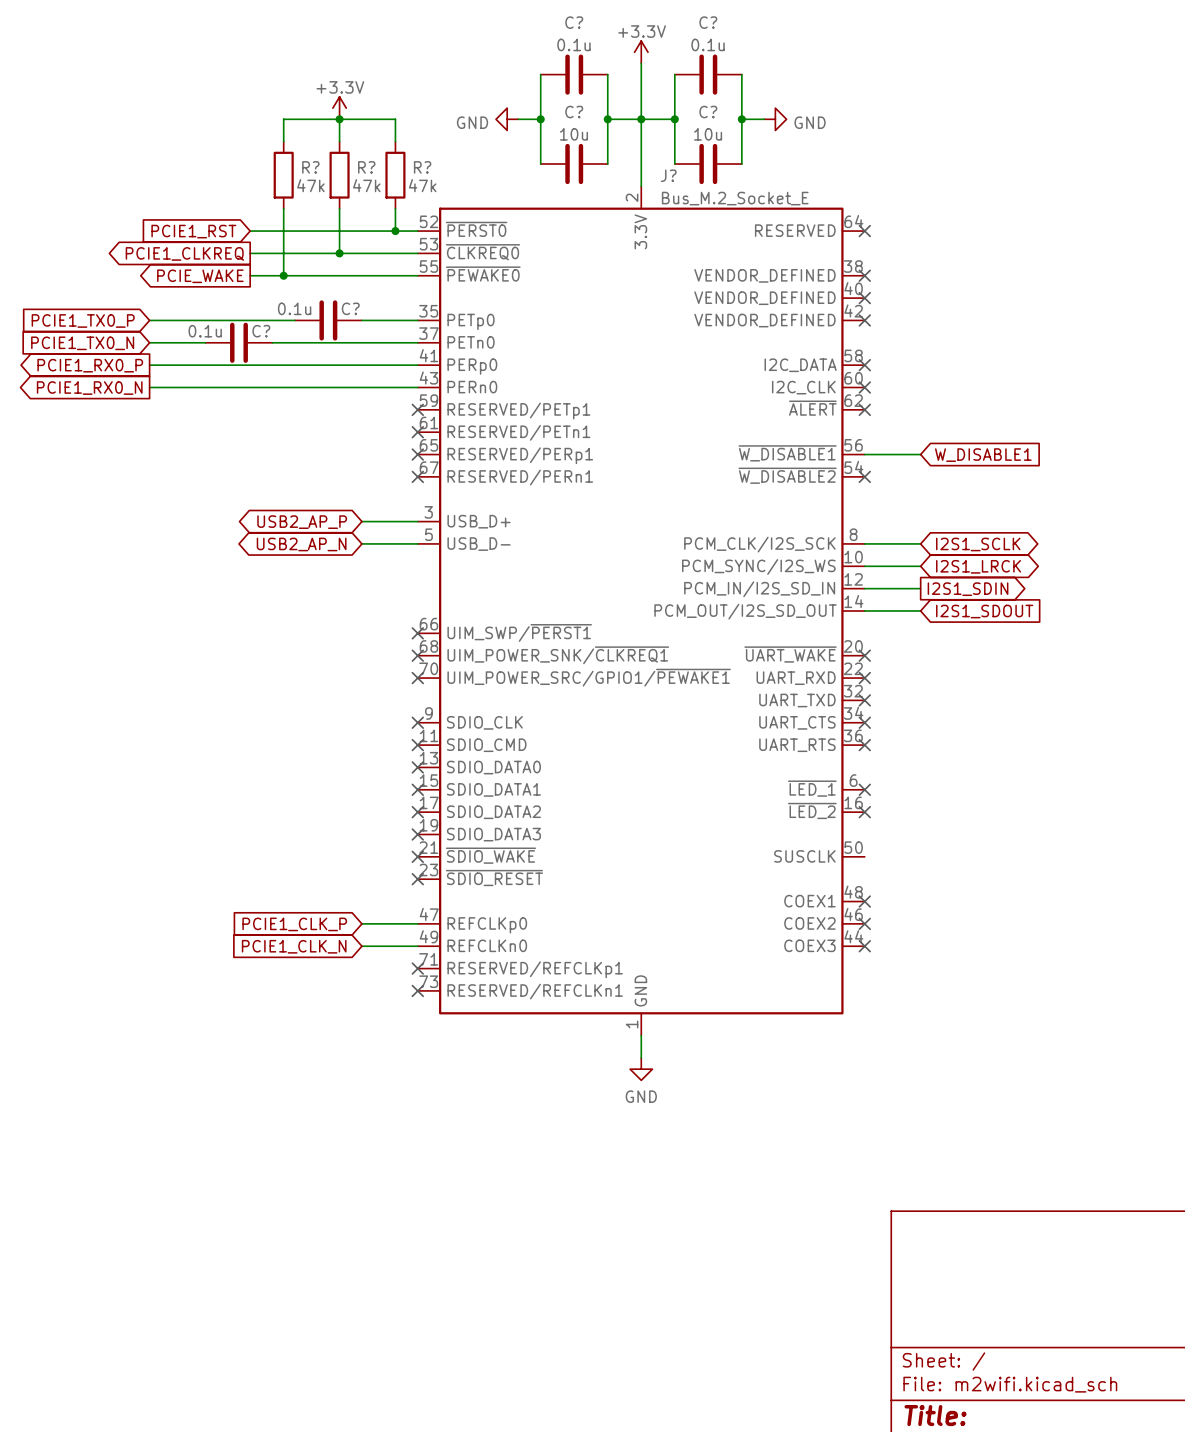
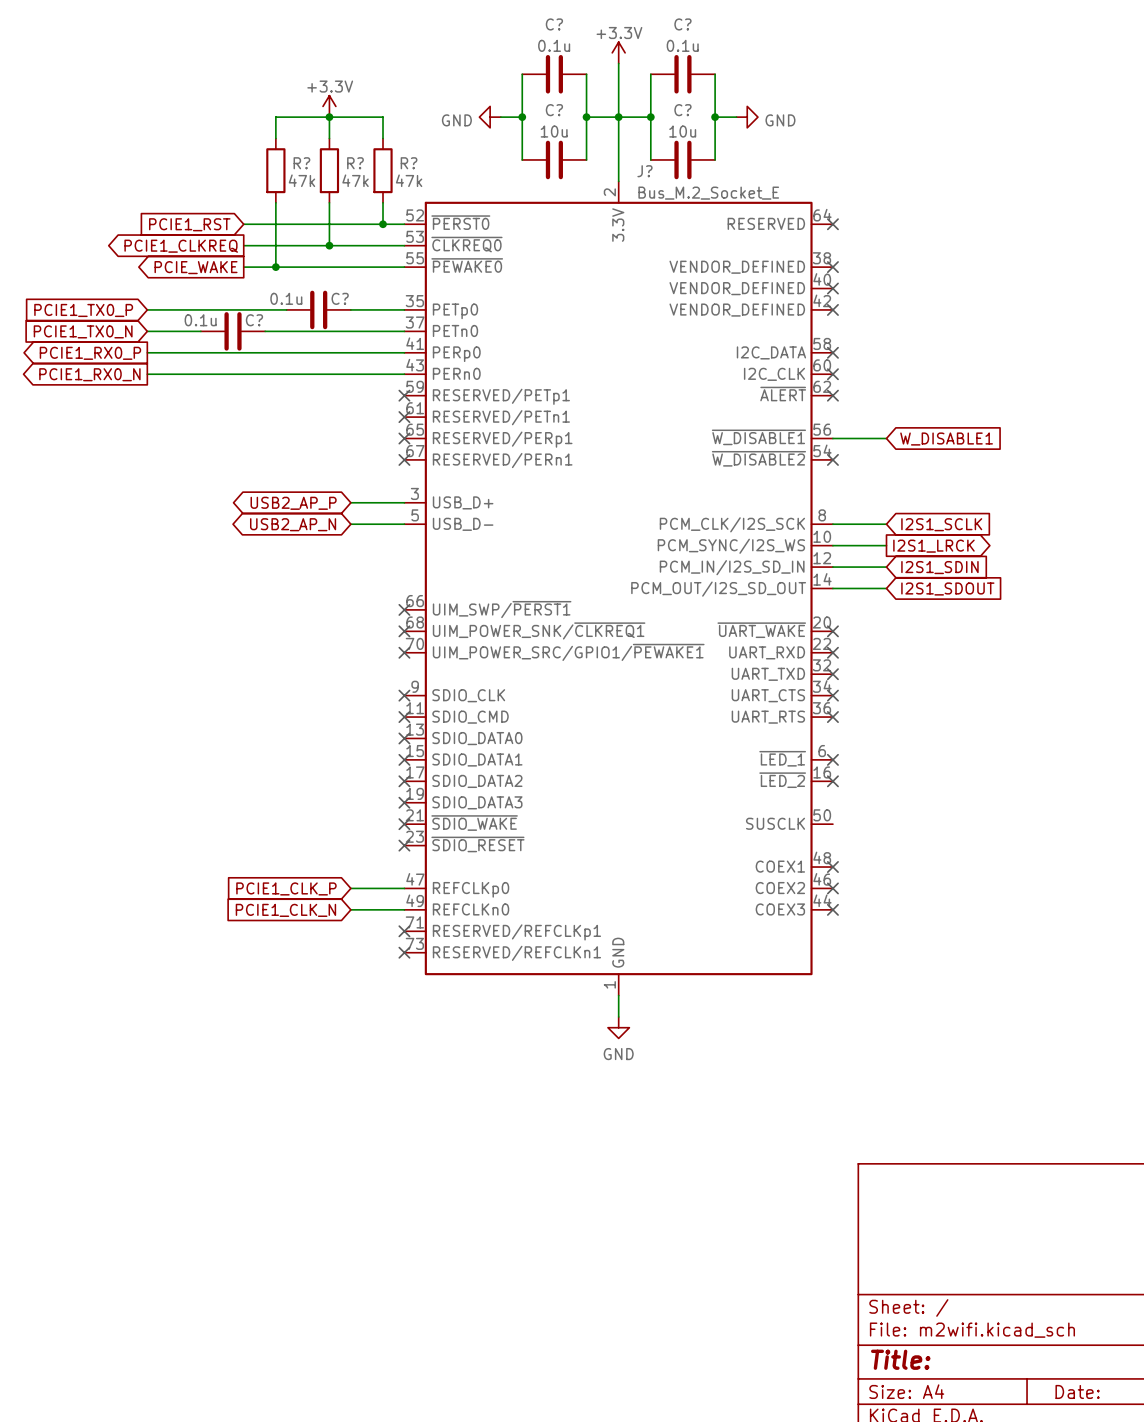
global label shape: bidirectional (978, 544) -> input (941, 524)
global label shape: bidirectional (978, 566) -> output (933, 546)
global label shape: output (968, 589) -> input (939, 567)

